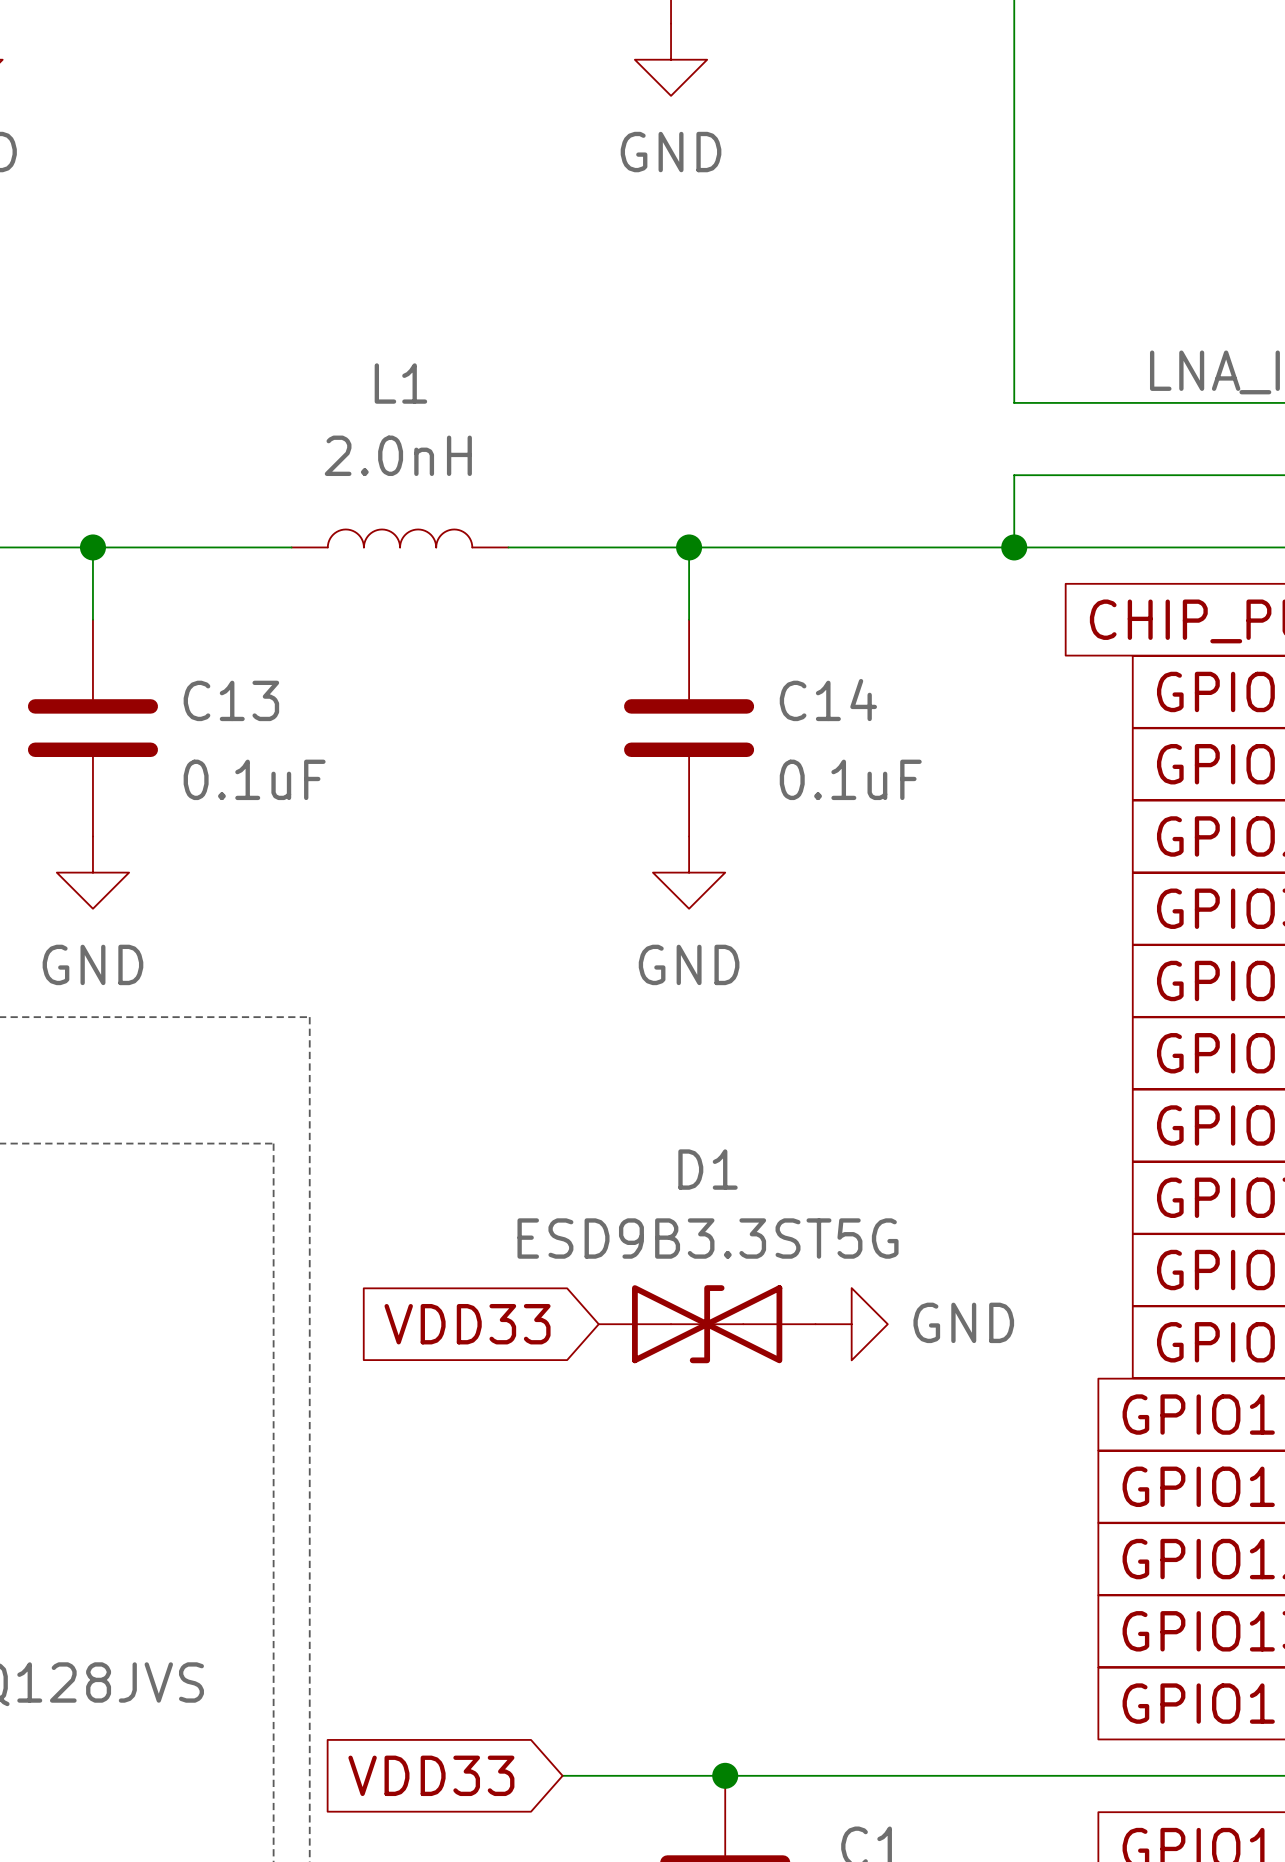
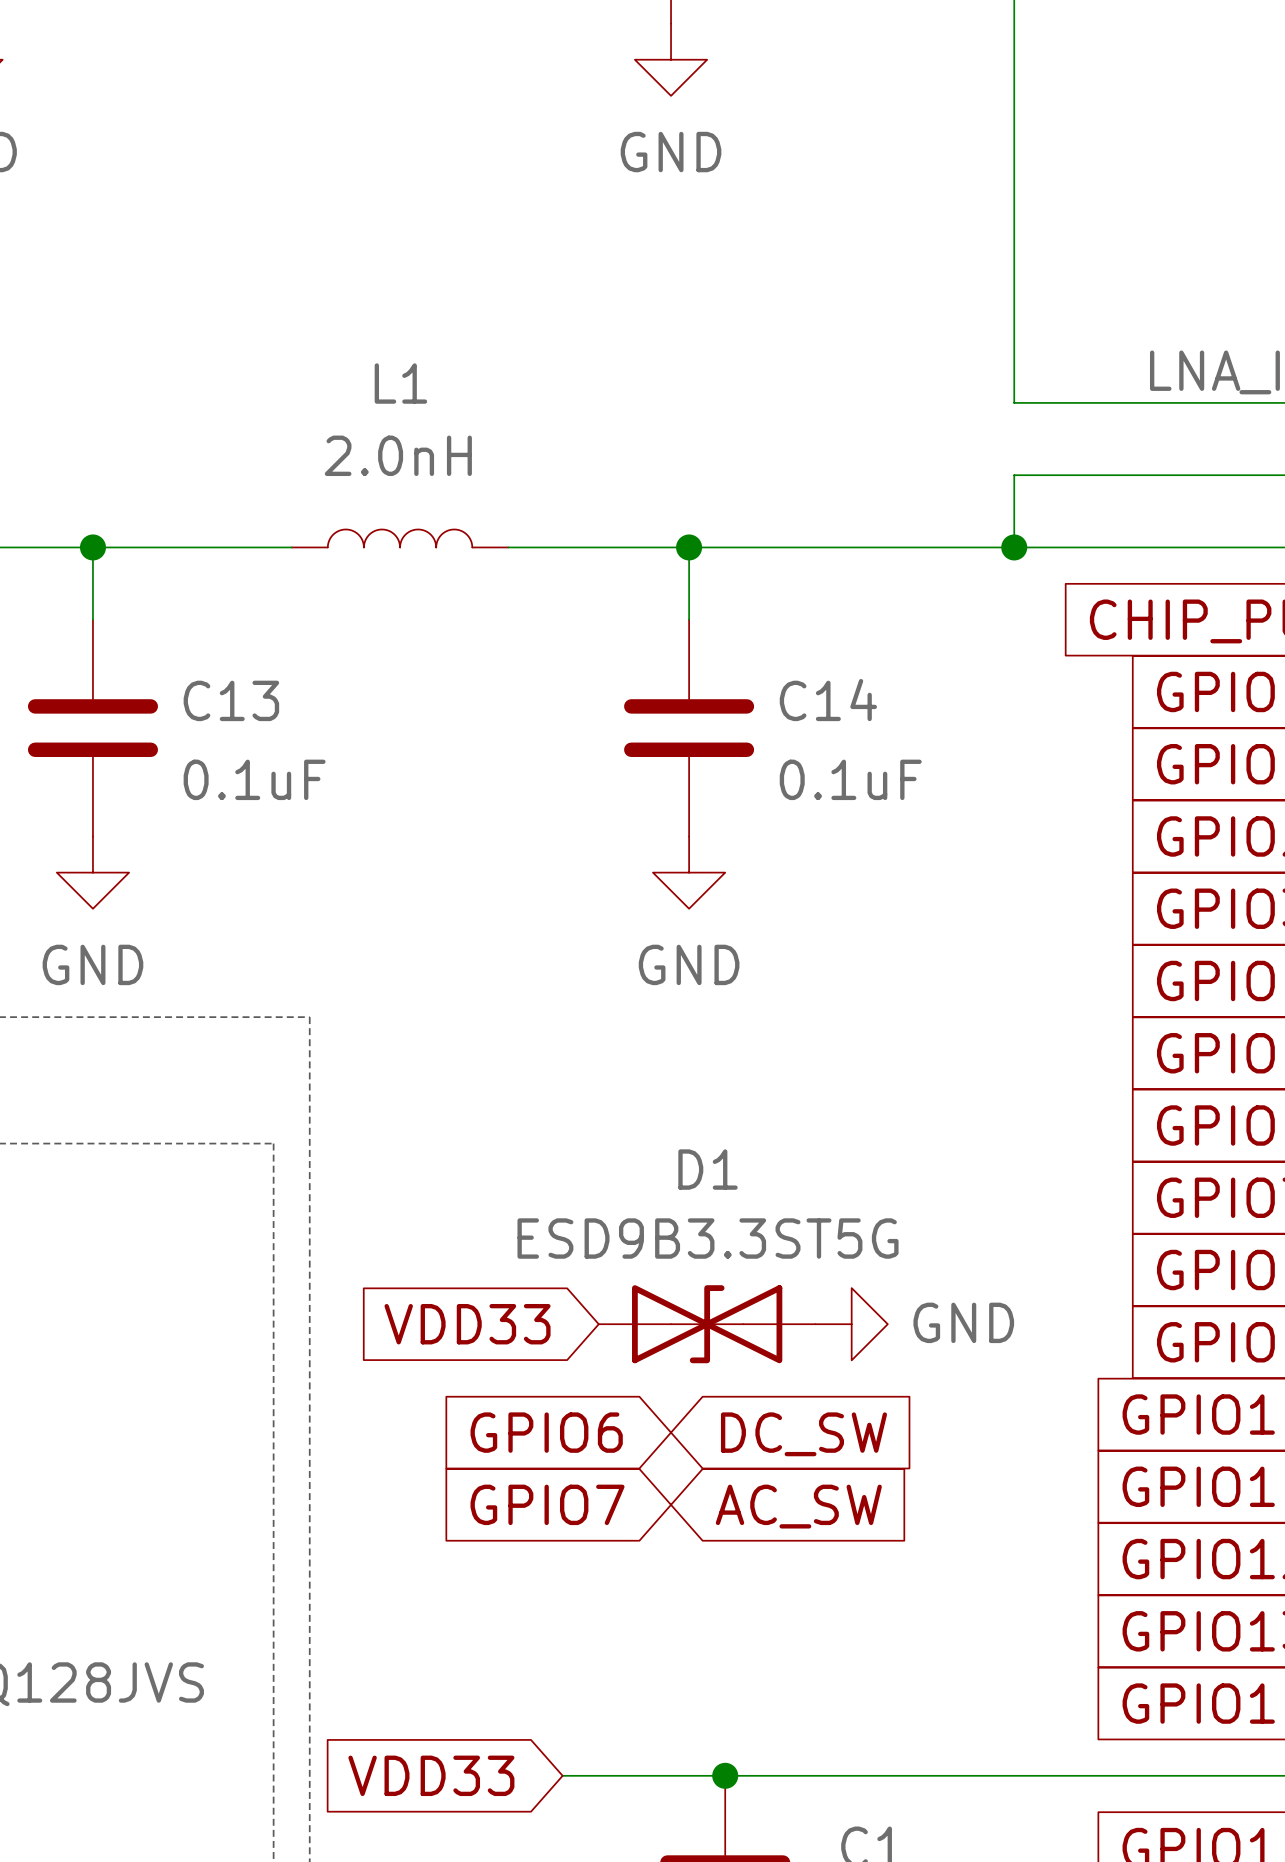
global label: none -> GPIO6 (546, 1432)
global label: none -> DC_SW (803, 1434)
global label: none -> GPIO7 (547, 1504)
global label: none -> AC_SW (798, 1506)

